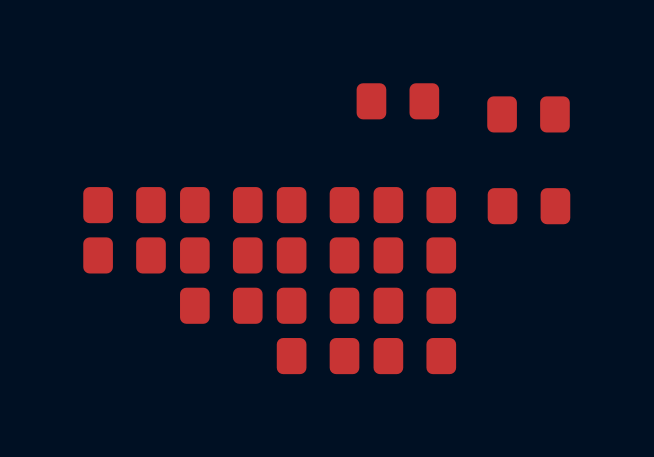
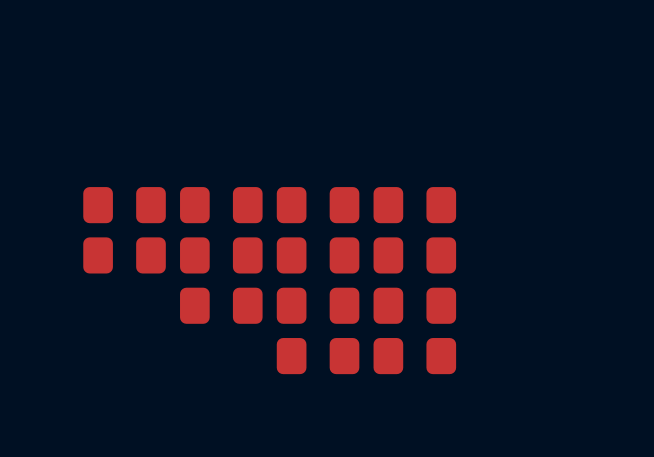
part: (397, 101) -> none
part: (528, 114) -> none
part: (528, 206) -> none

